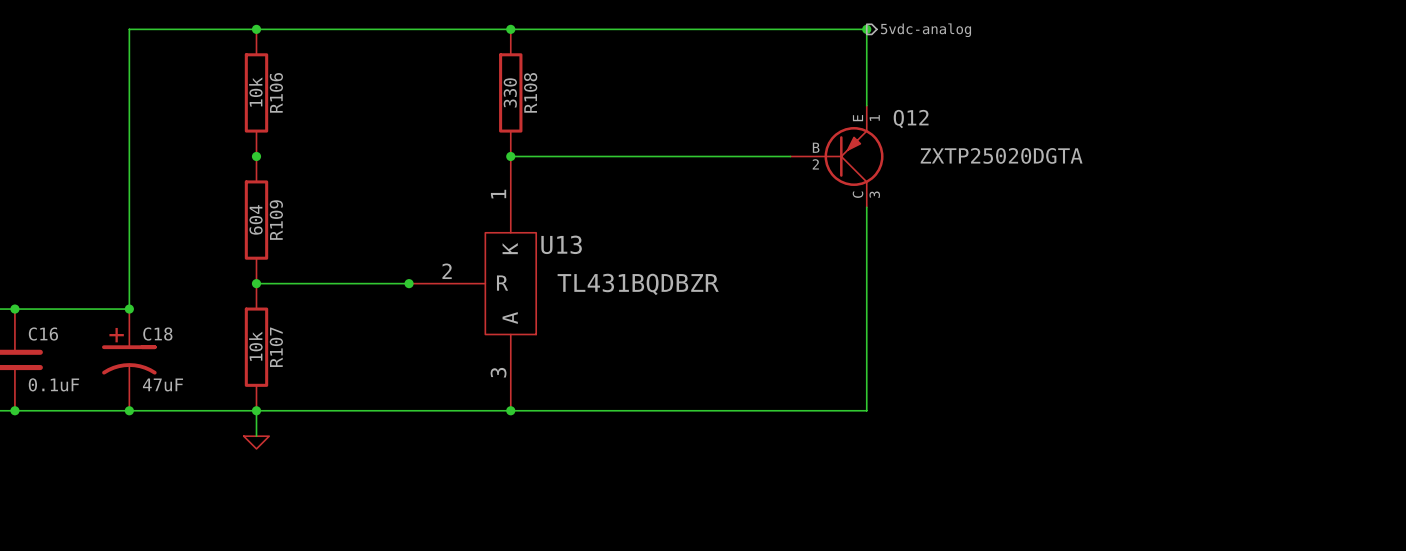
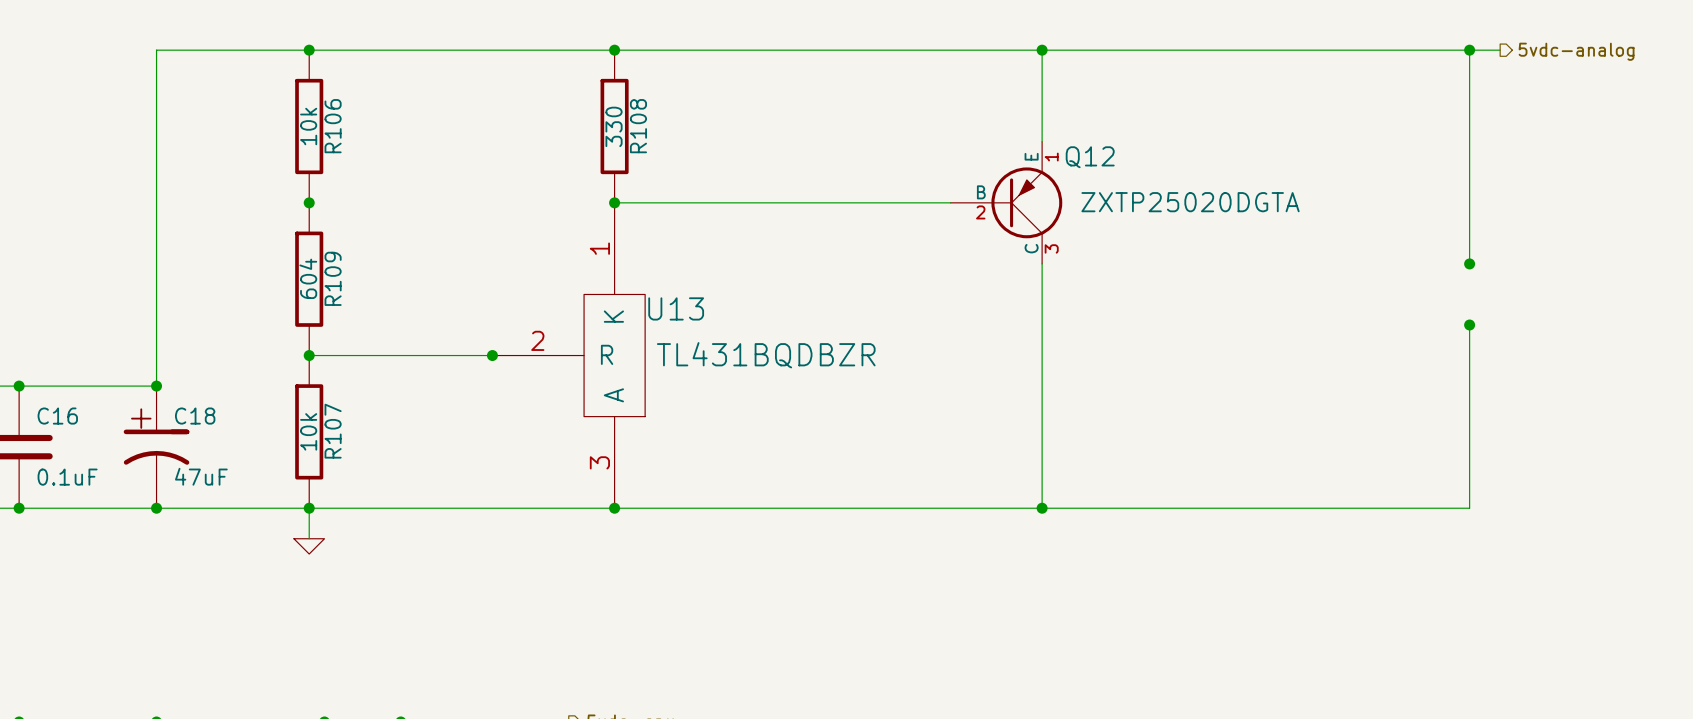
wire: none -> (1042, 50) (1500, 50)
wire: none -> (1469, 50) (1469, 263)
junction: none -> (1469, 50)
hierarchical label: 5vdc-analog (926, 30) -> none
hierarchical label: none -> 5vdc-analog (1576, 51)
junction: none -> (1469, 263)
wire: none -> (1469, 325) (1469, 508) (1042, 508)
junction: none -> (1469, 325)
junction: none -> (1042, 508)

